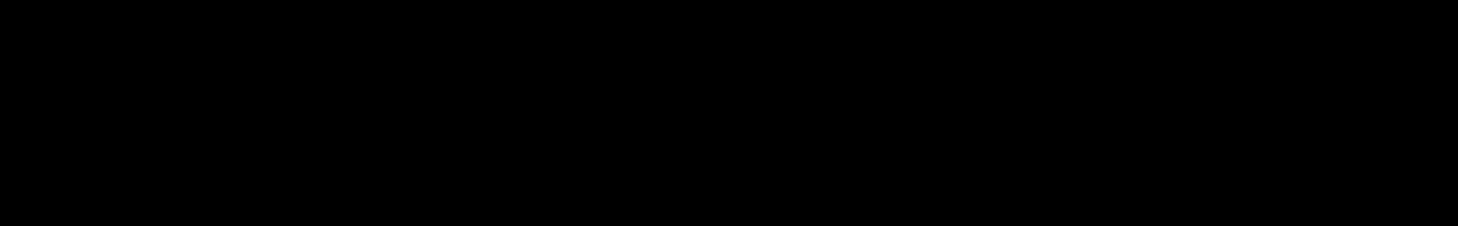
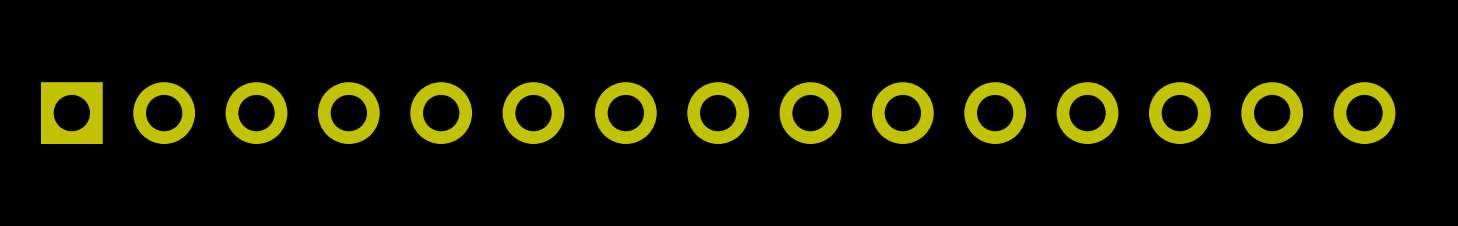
part: none -> (718, 113)

